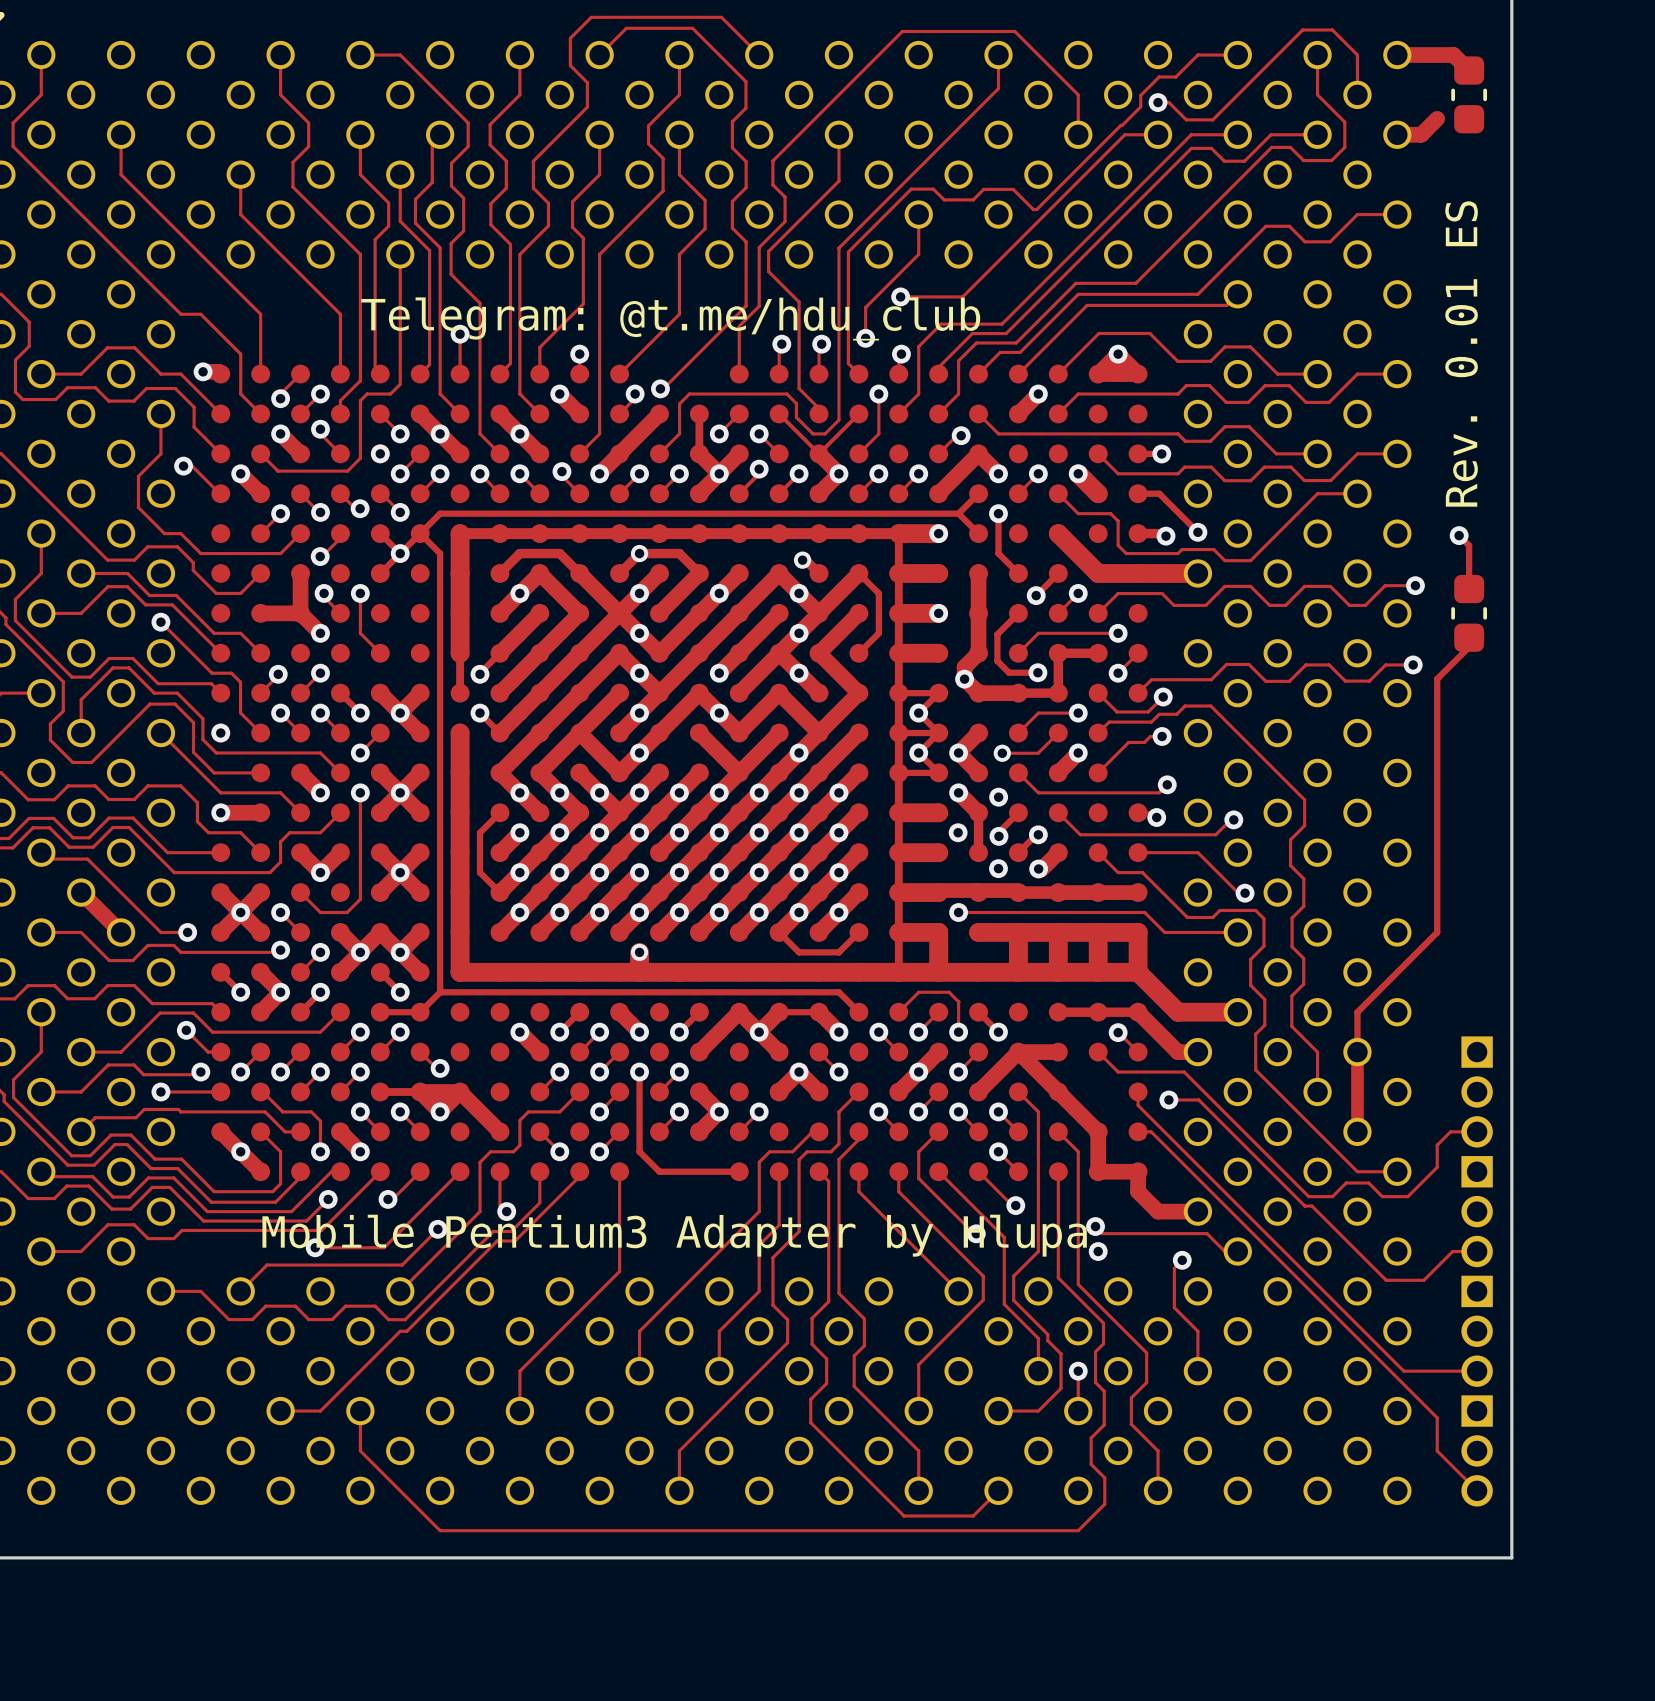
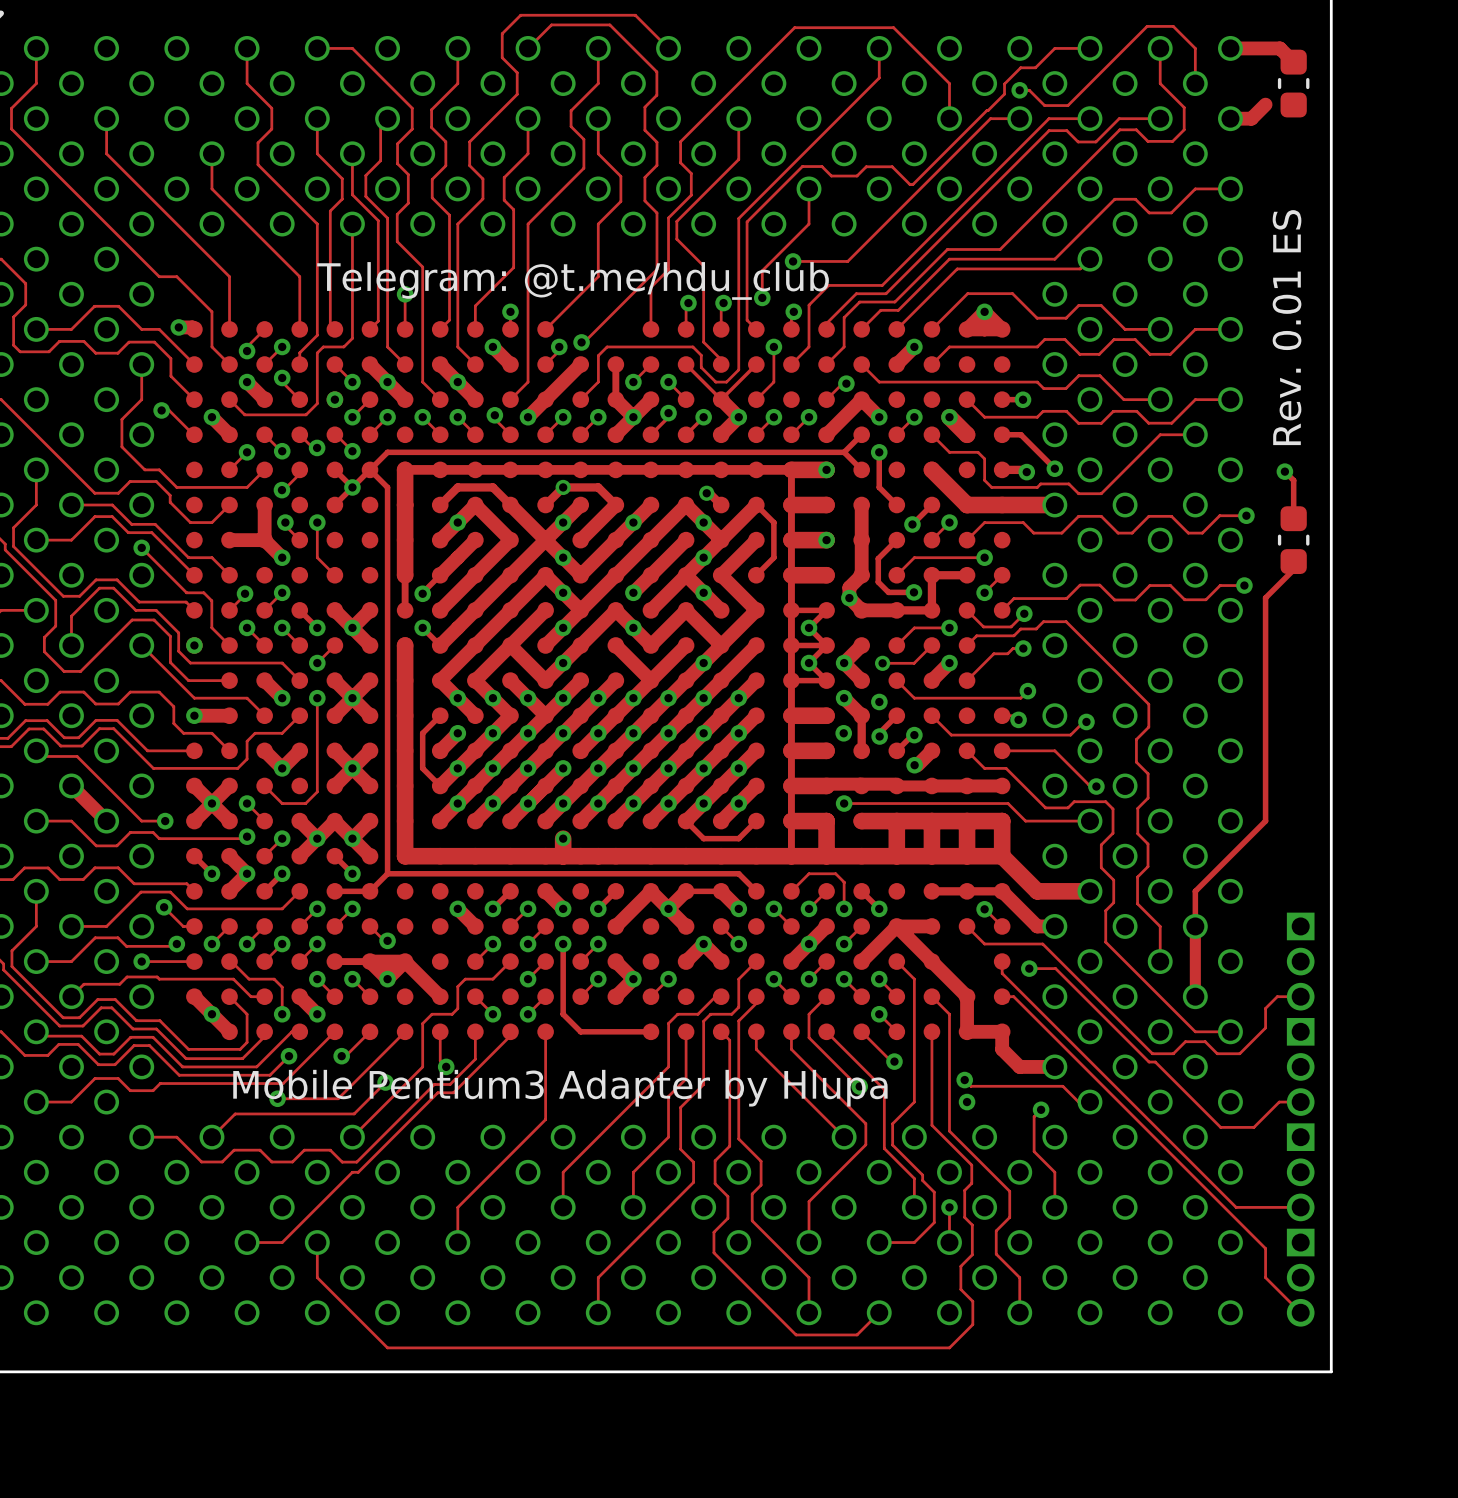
via: (998, 868) -> none

